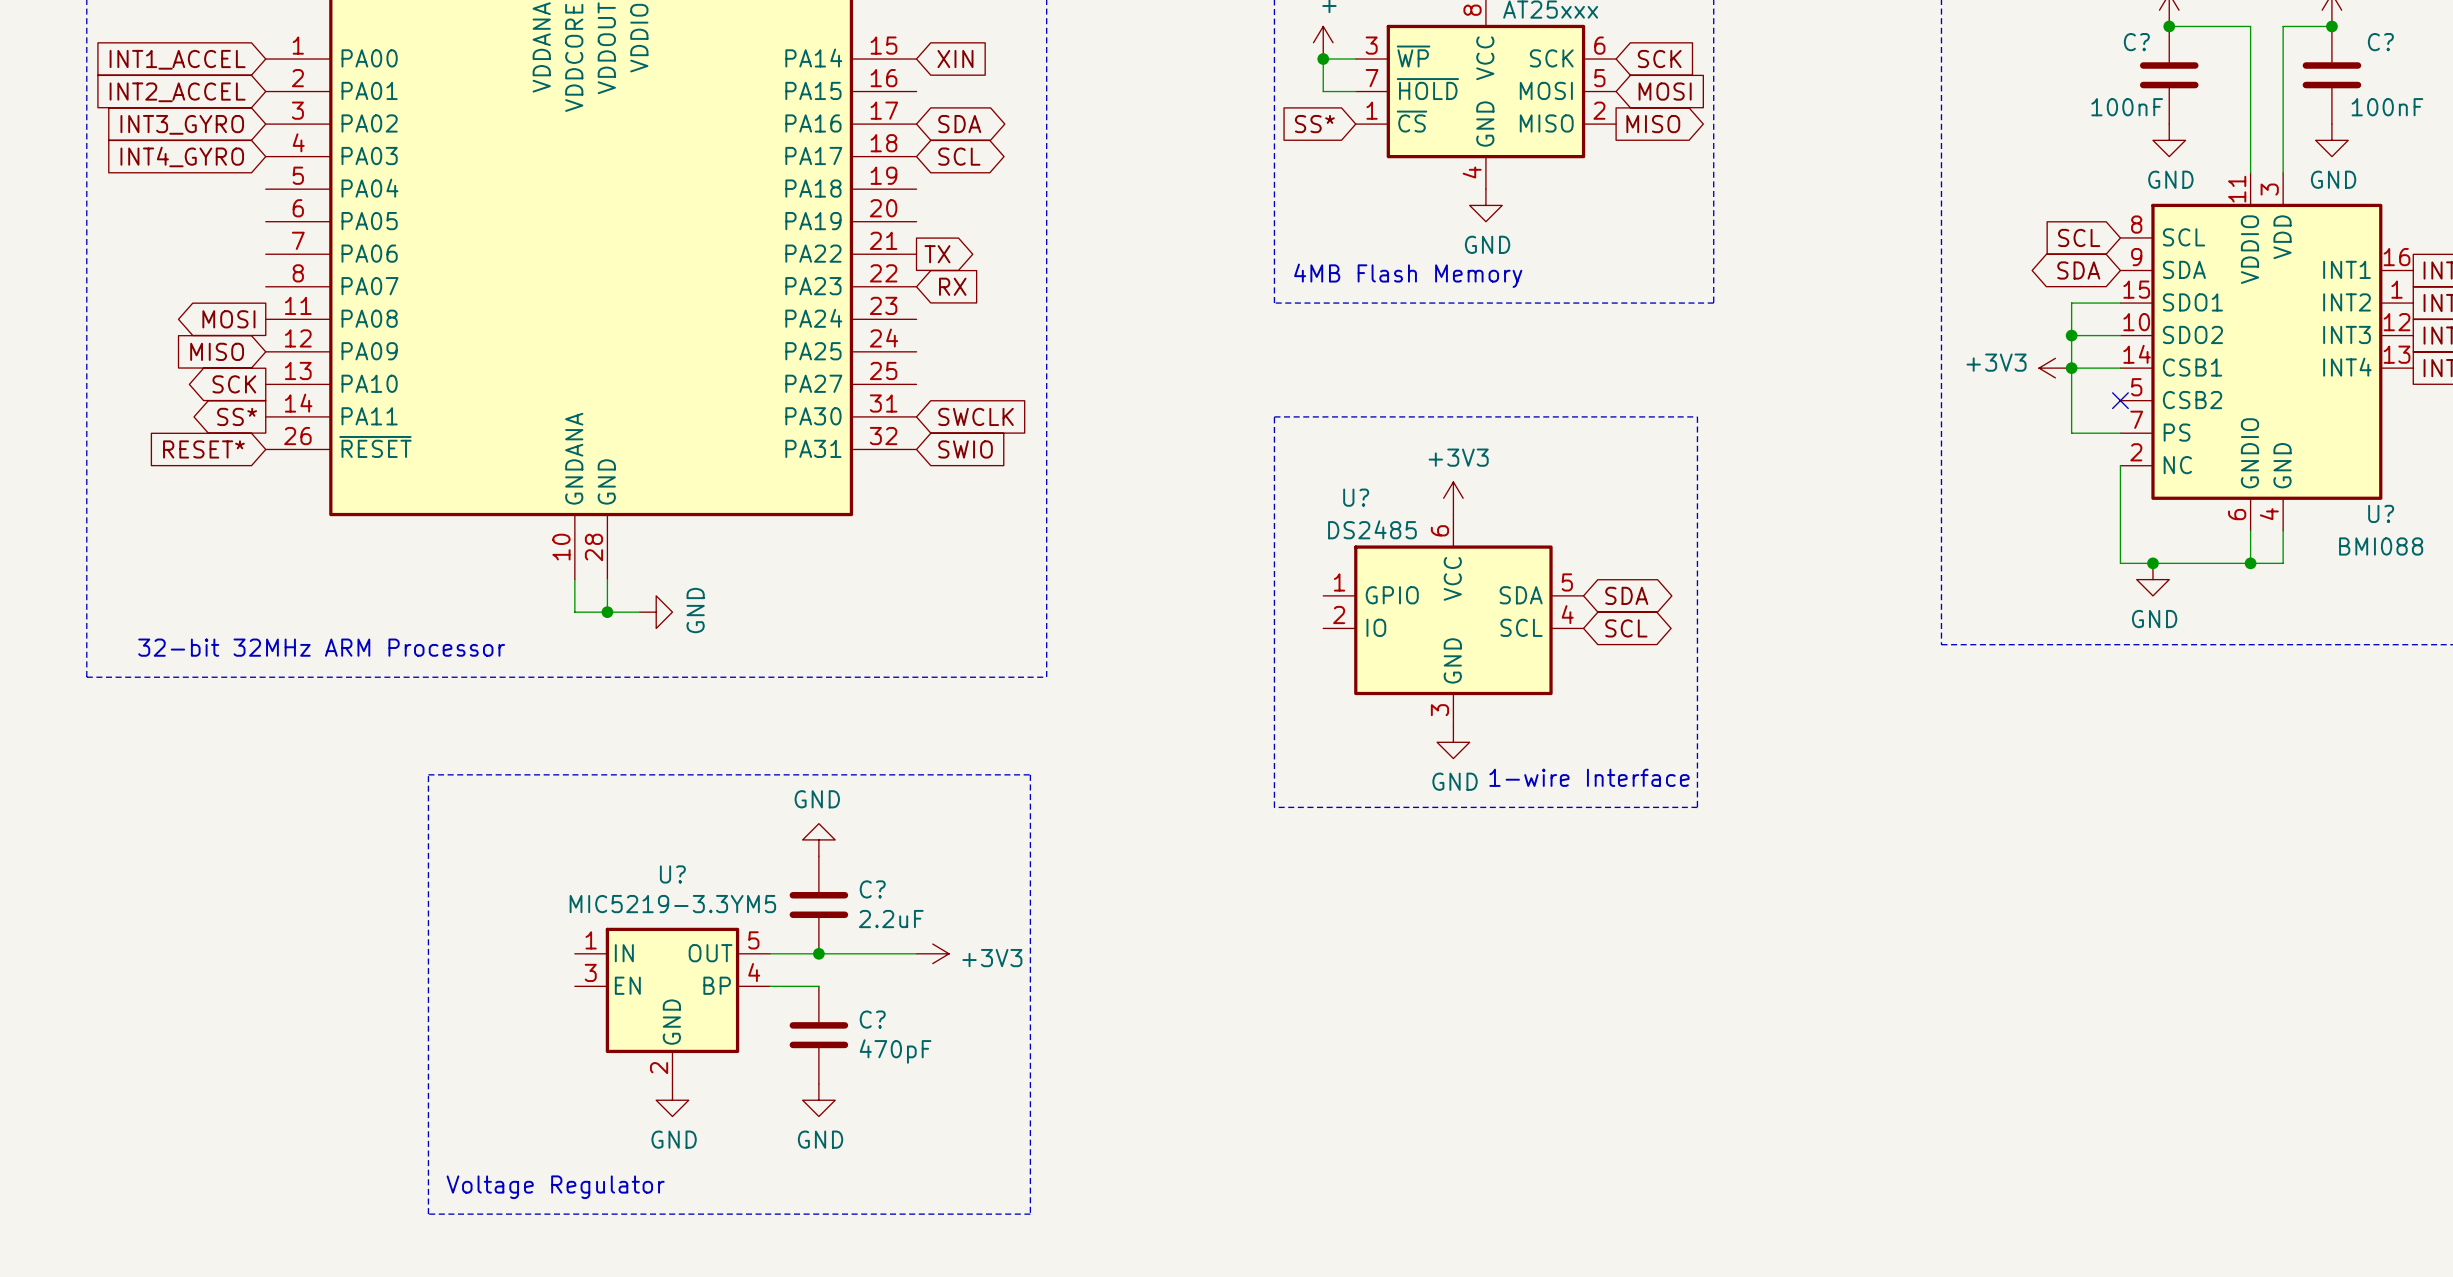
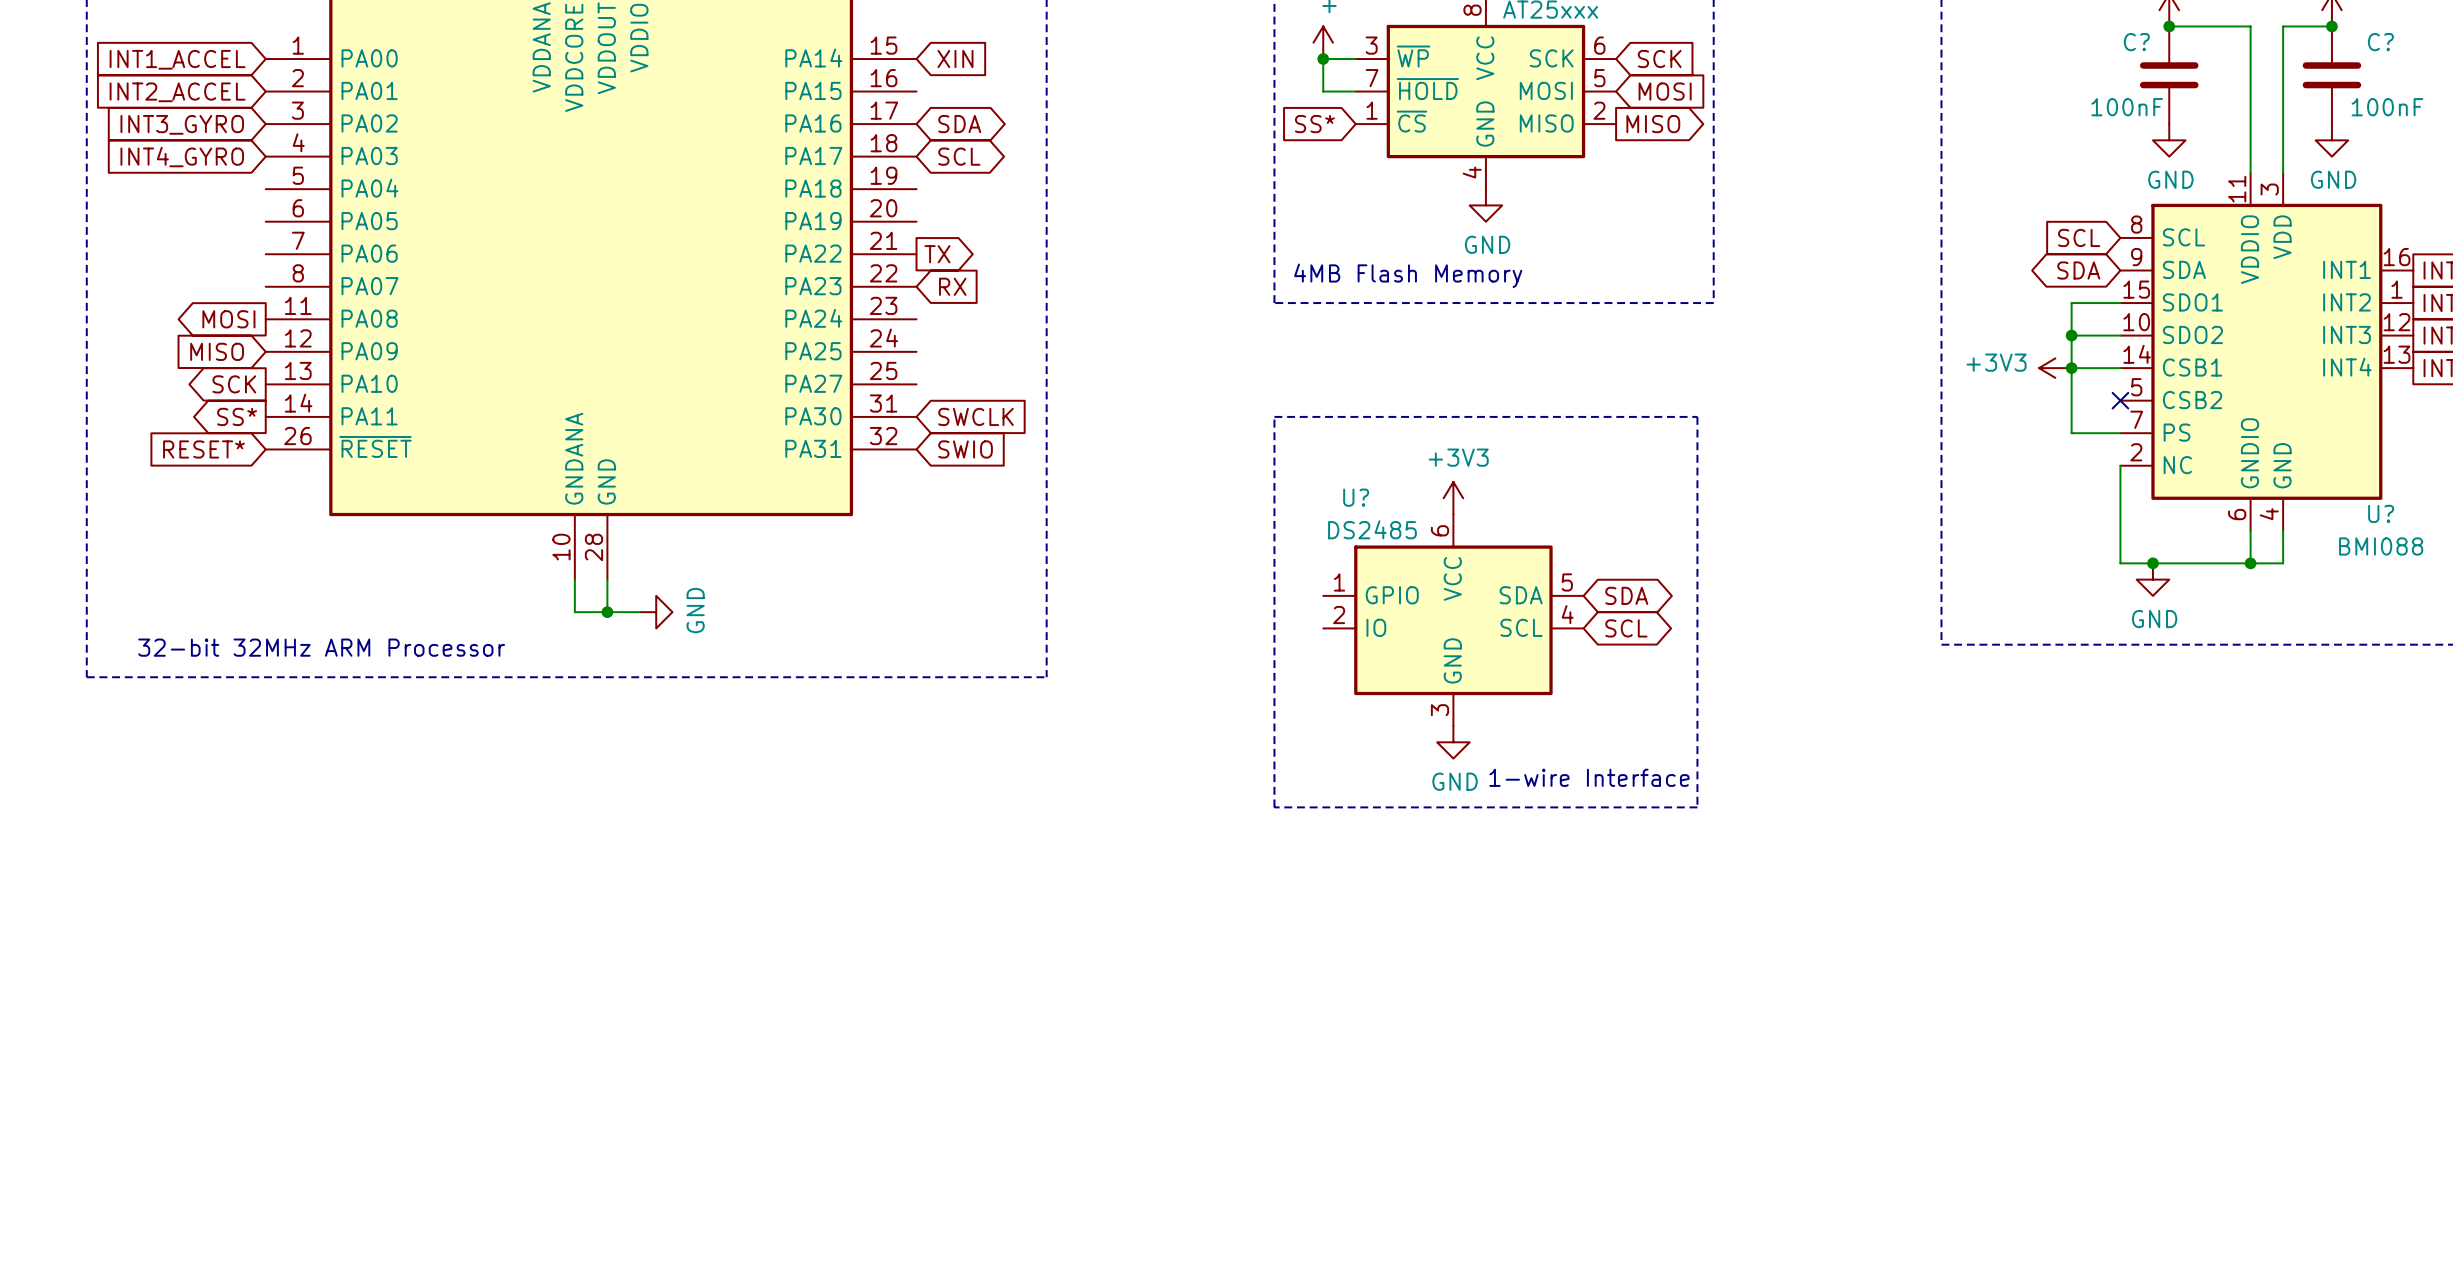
line: (428, 774) (1030, 774) (1030, 1214) (428, 1214) (428, 774) -> none
power symbol: GND (818, 839) -> none
C?: 2.2uF (818, 905) -> none
wire: (770, 953) (916, 953) -> none
junction: (818, 953) -> none
power symbol: +3V3 (932, 953) -> none
wire: (770, 986) (818, 986) -> none
U?: MIC5219-3.3YM5 (672, 1005) -> none
C?: 470pF (818, 1035) -> none
power symbol: GND (672, 1100) -> none
power symbol: GND (818, 1100) -> none
text: Voltage Regulator (555, 1187) -> none

